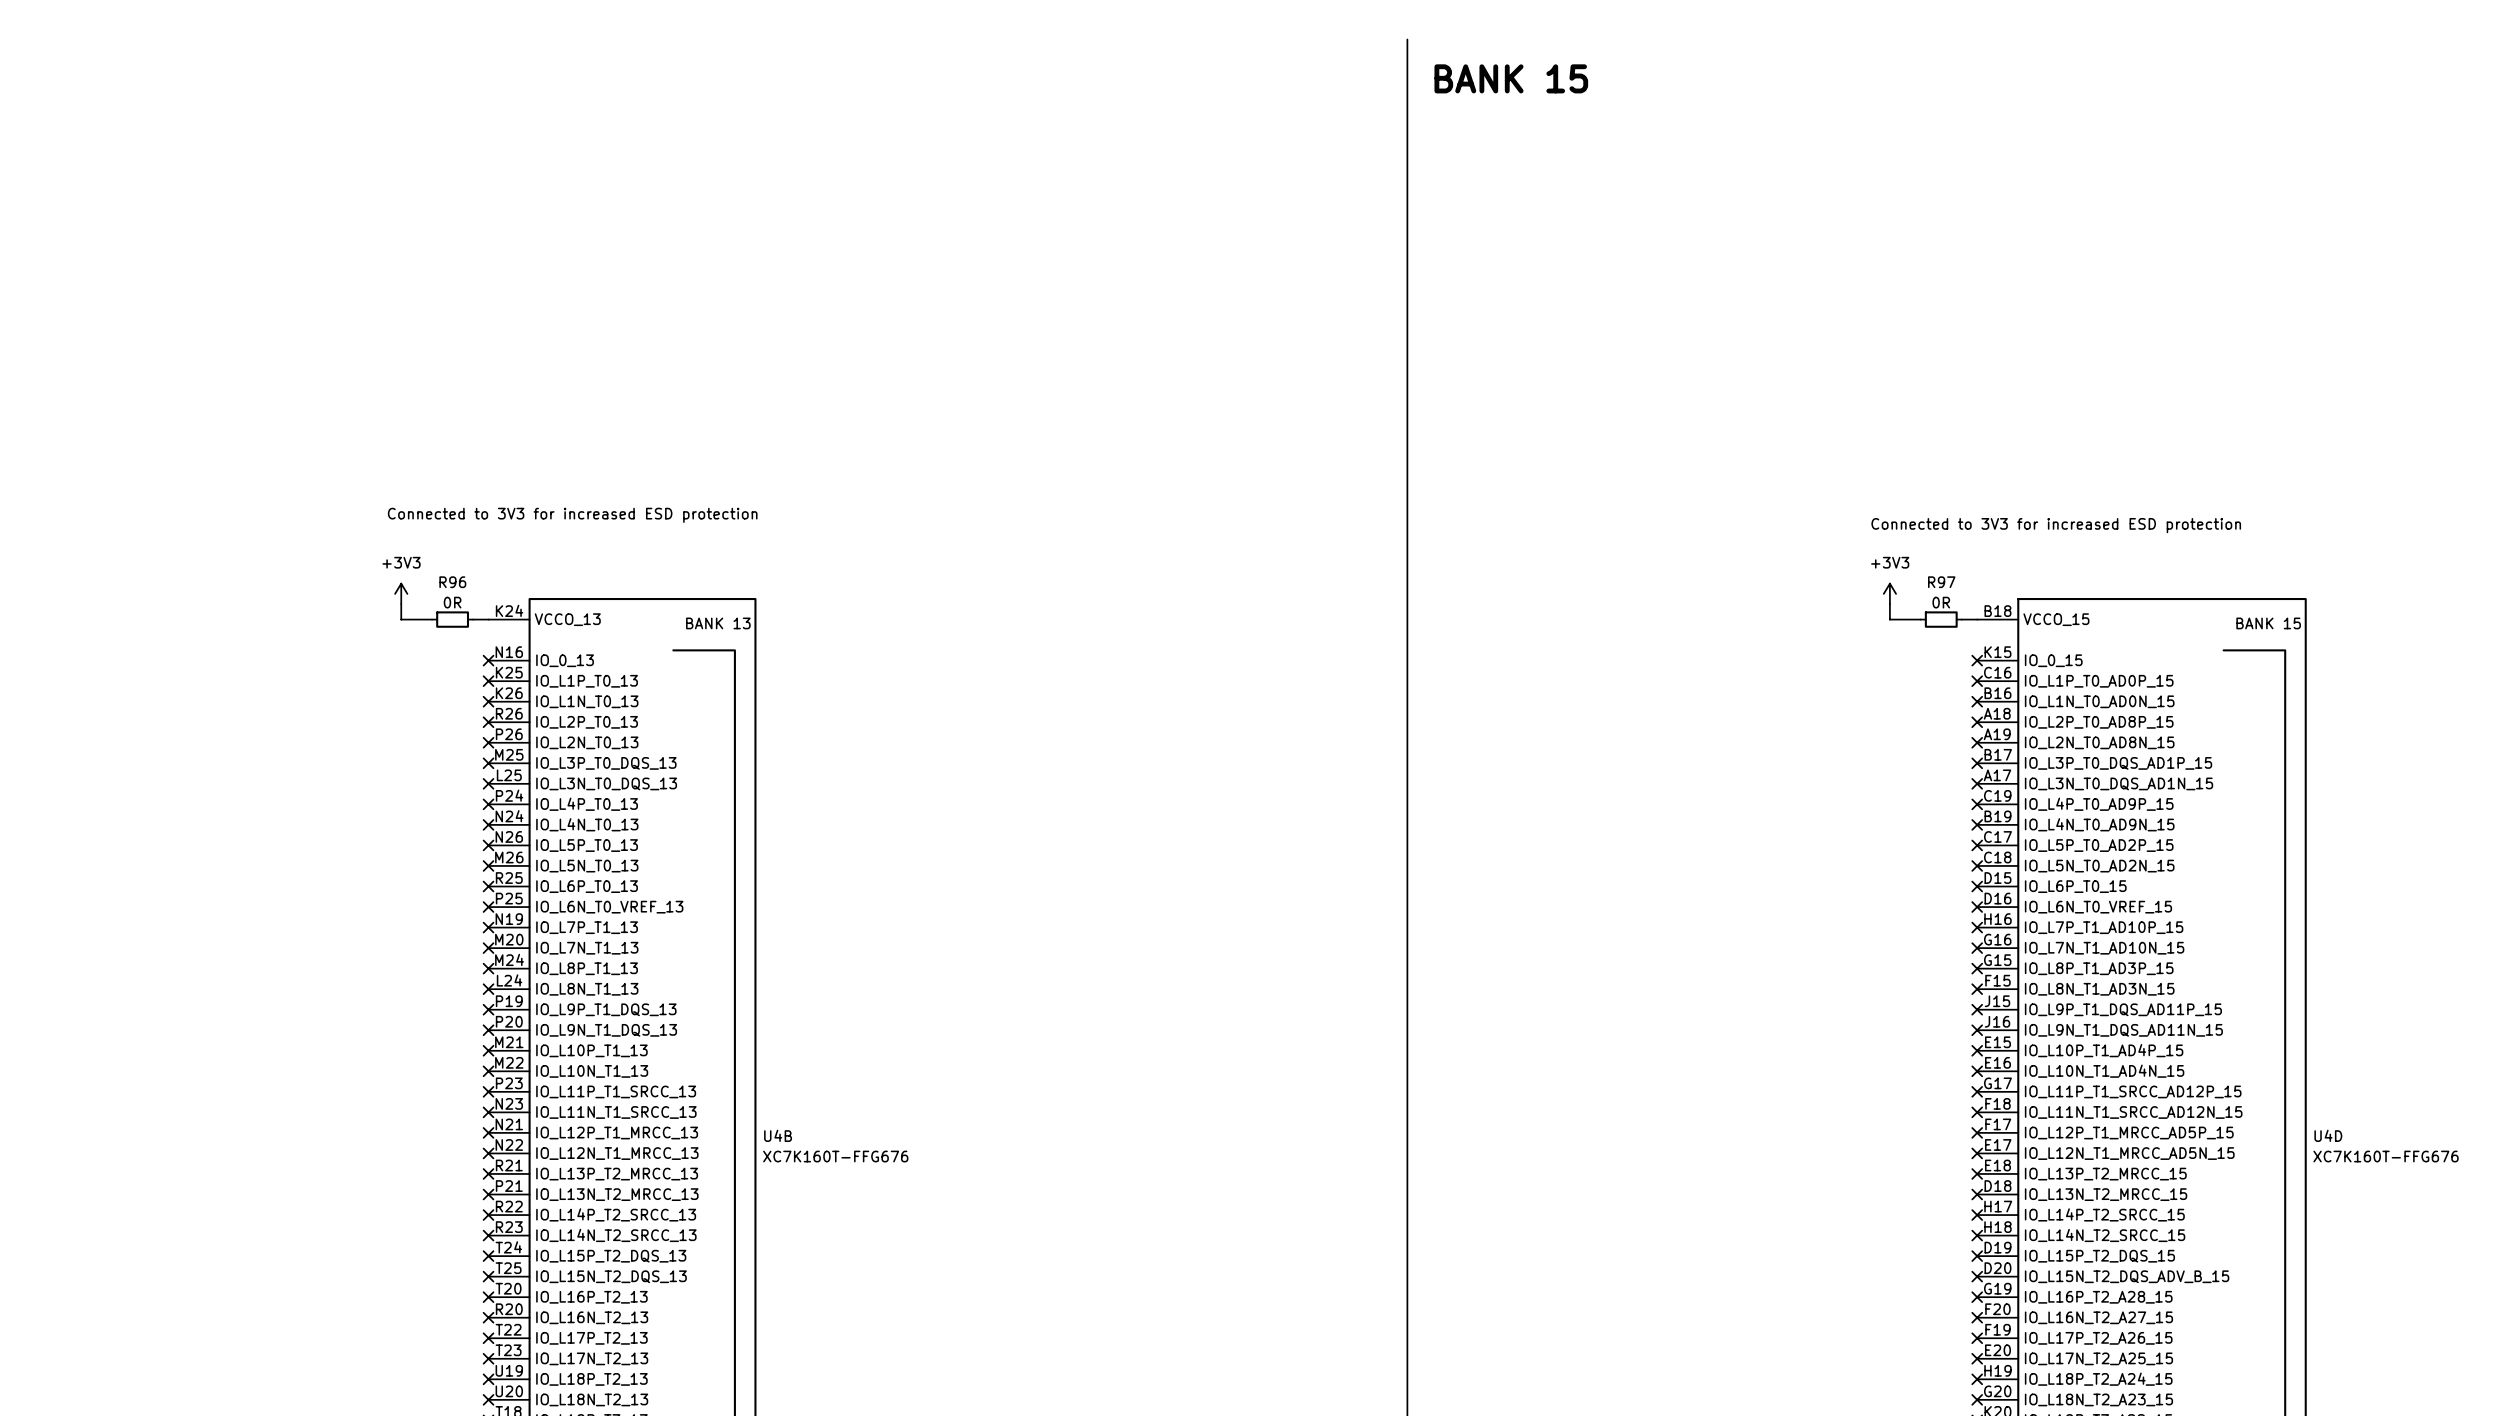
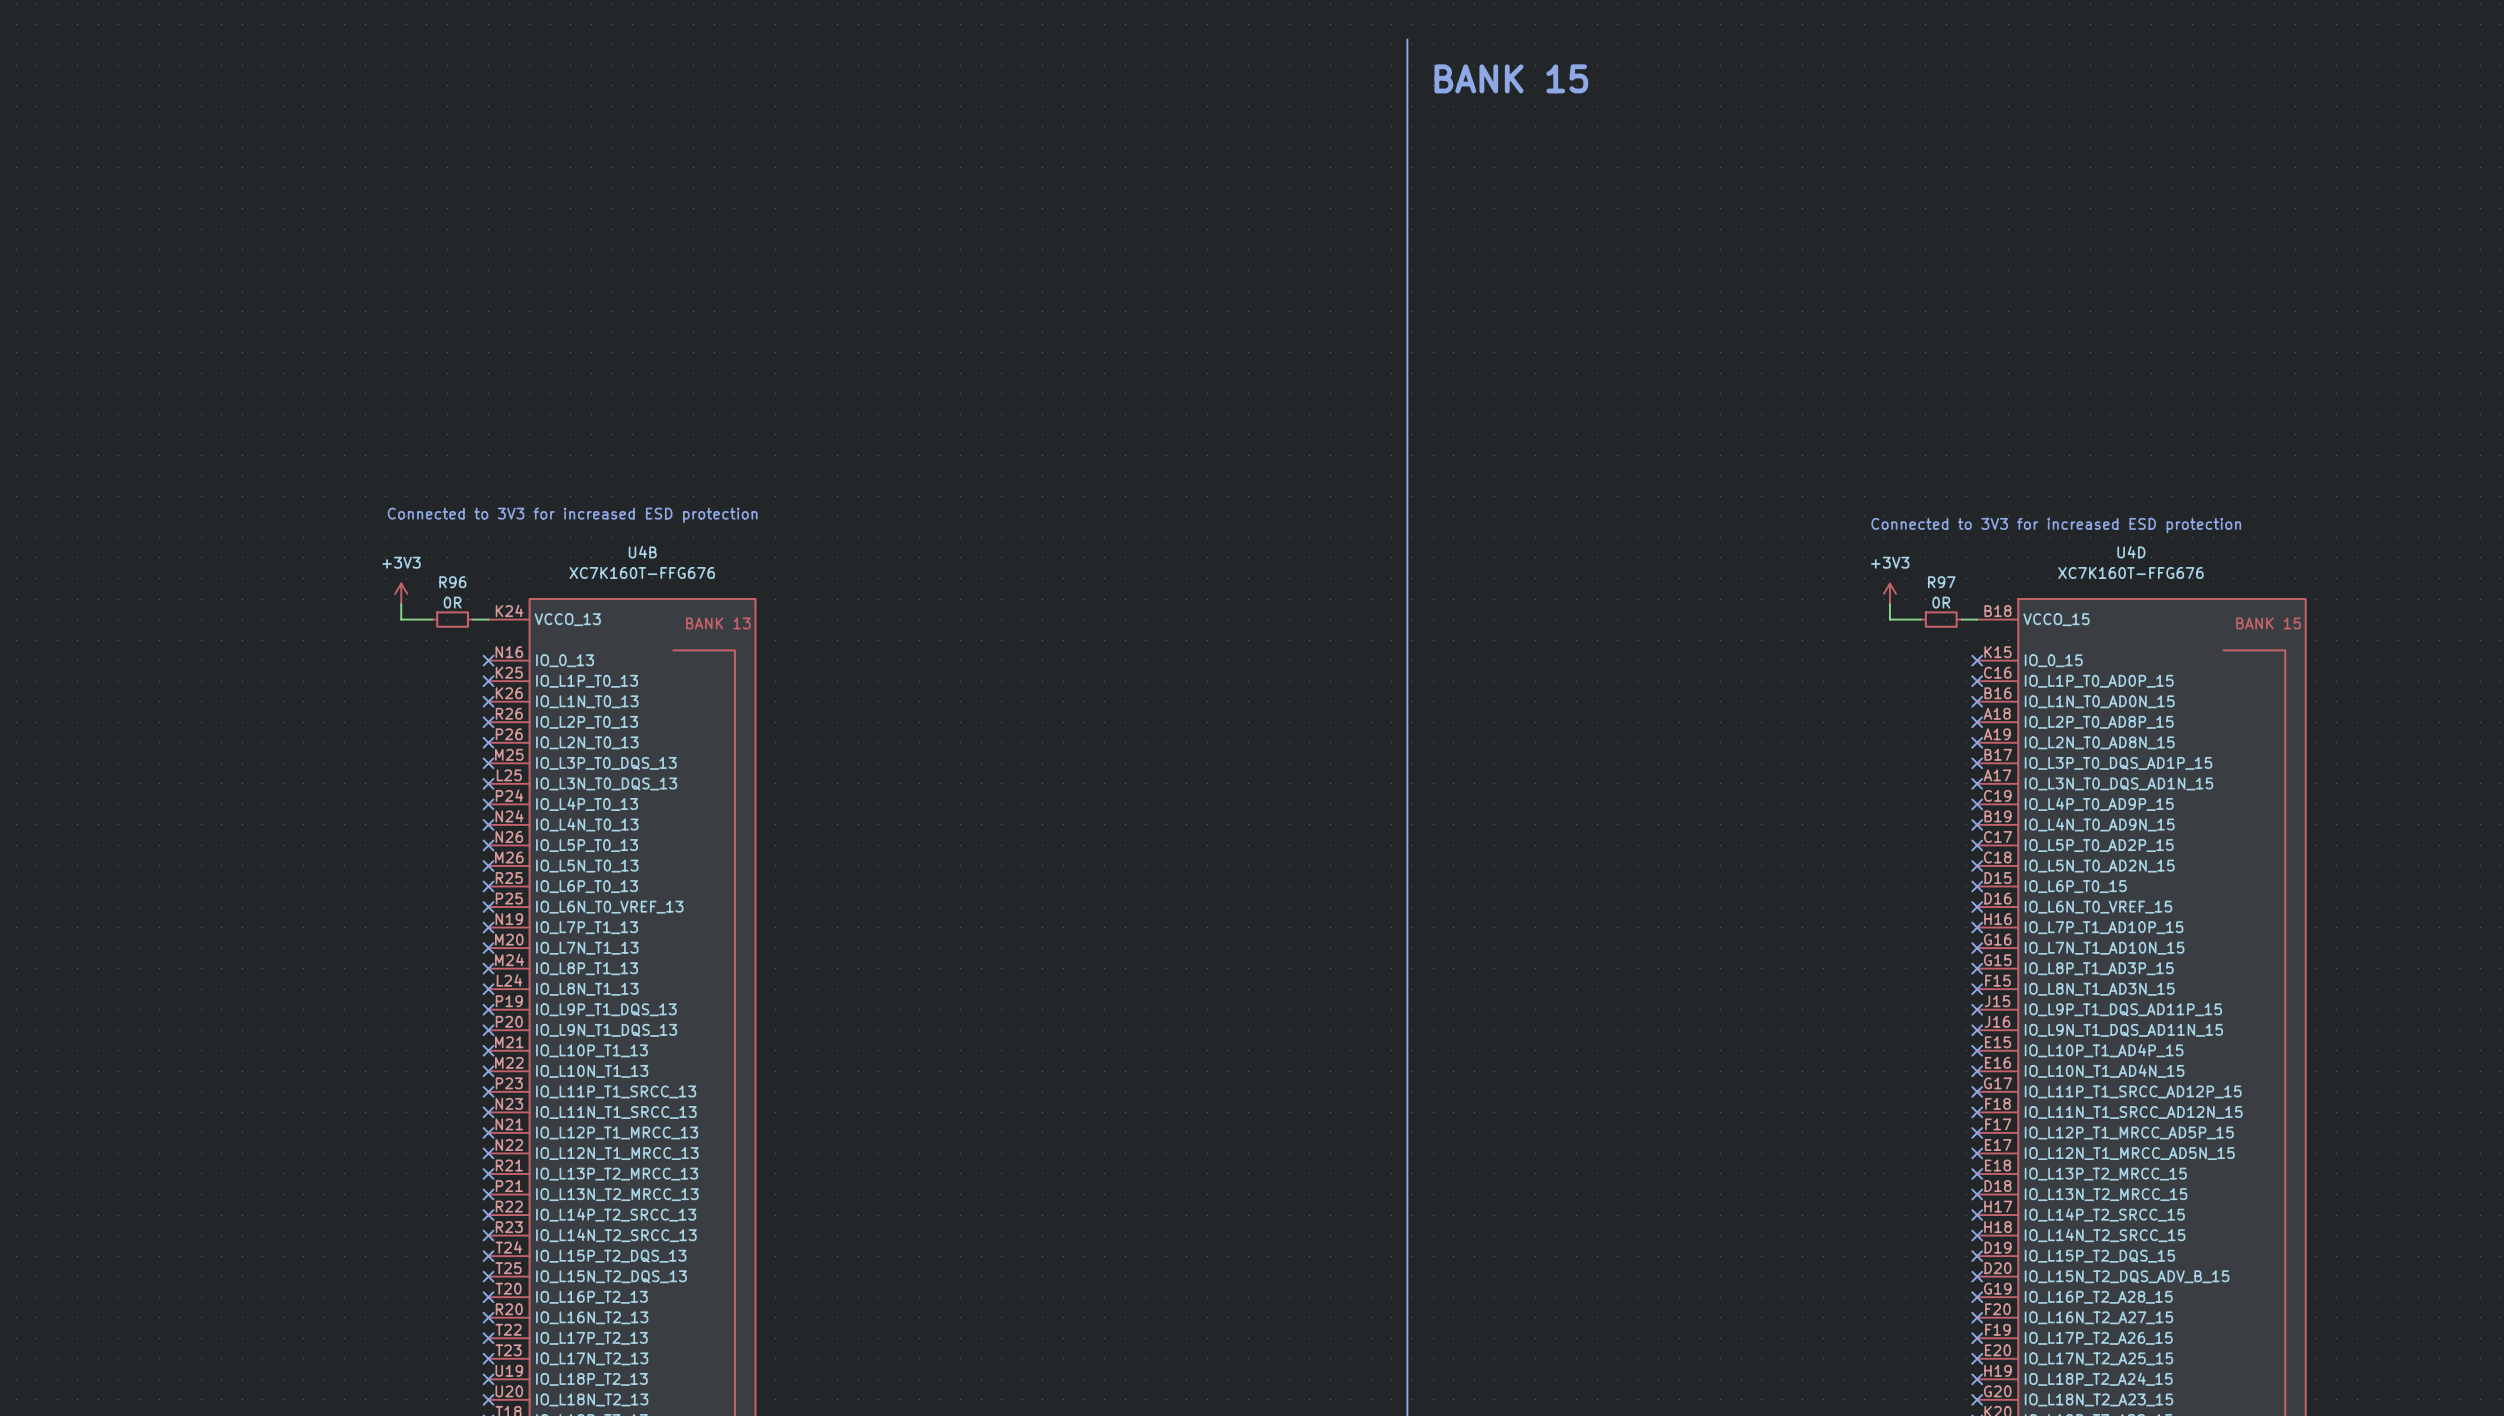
U4B name position: U4B (778, 1135) -> U4B (642, 552)
U4D name position: U4D (2328, 1135) -> U4D (2131, 552)
U4B value position: XC7K160T-FFG676 (835, 1156) -> XC7K160T-FFG676 (642, 572)
U4D value position: XC7K160T-FFG676 (2386, 1156) -> XC7K160T-FFG676 (2130, 572)

